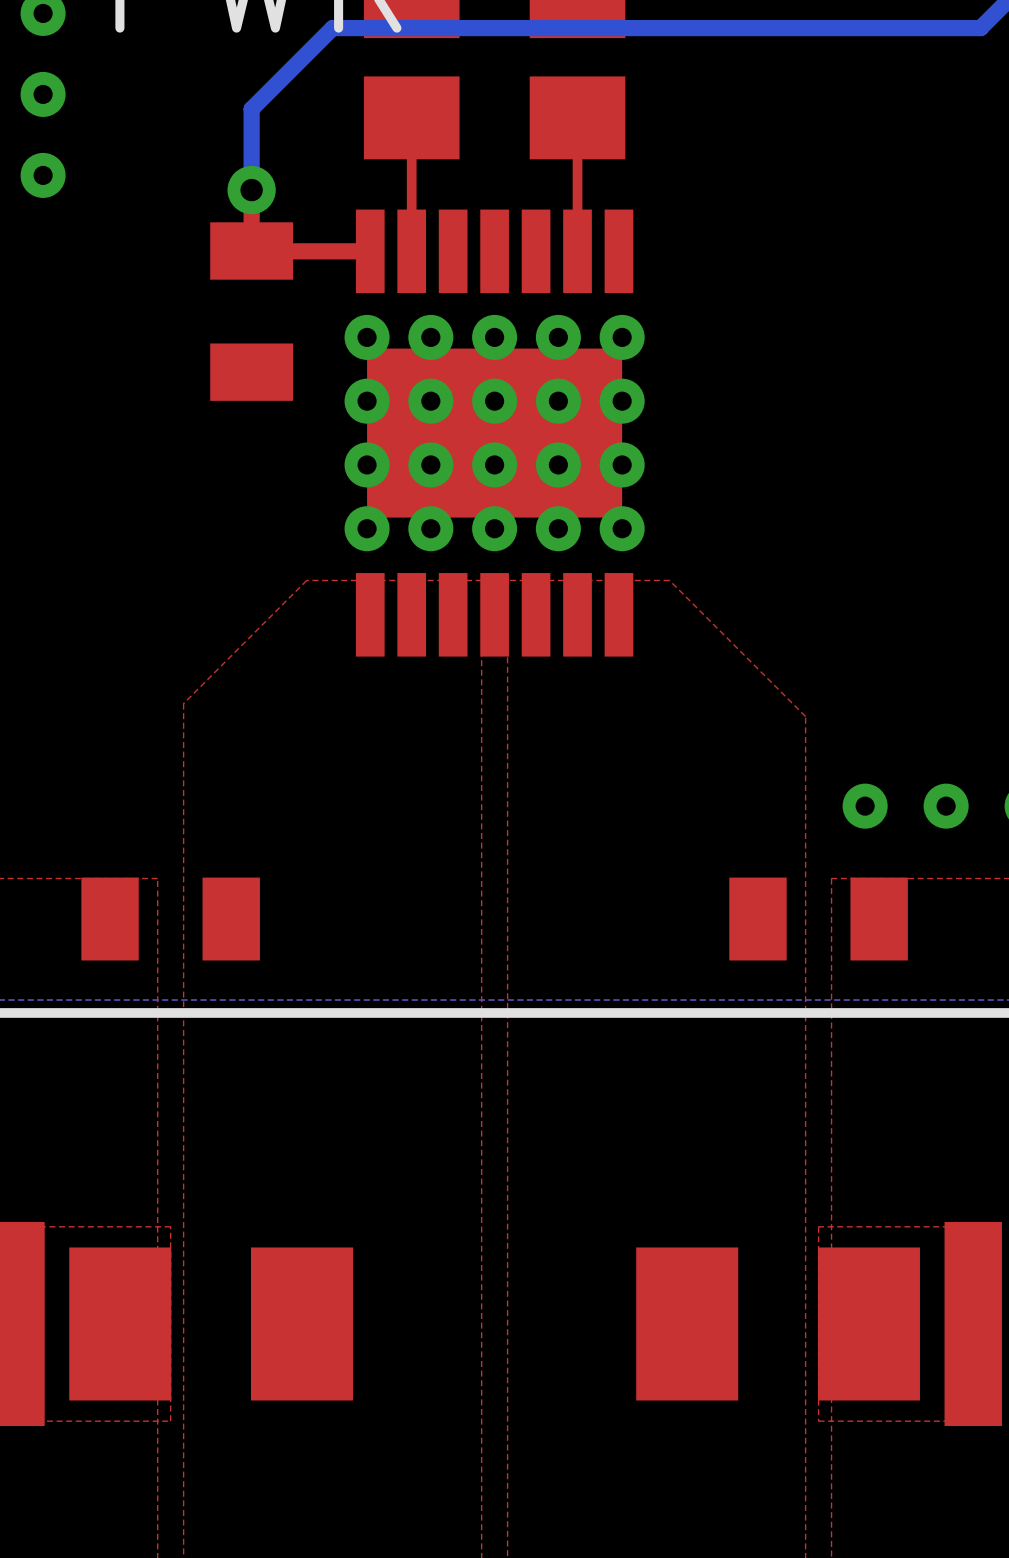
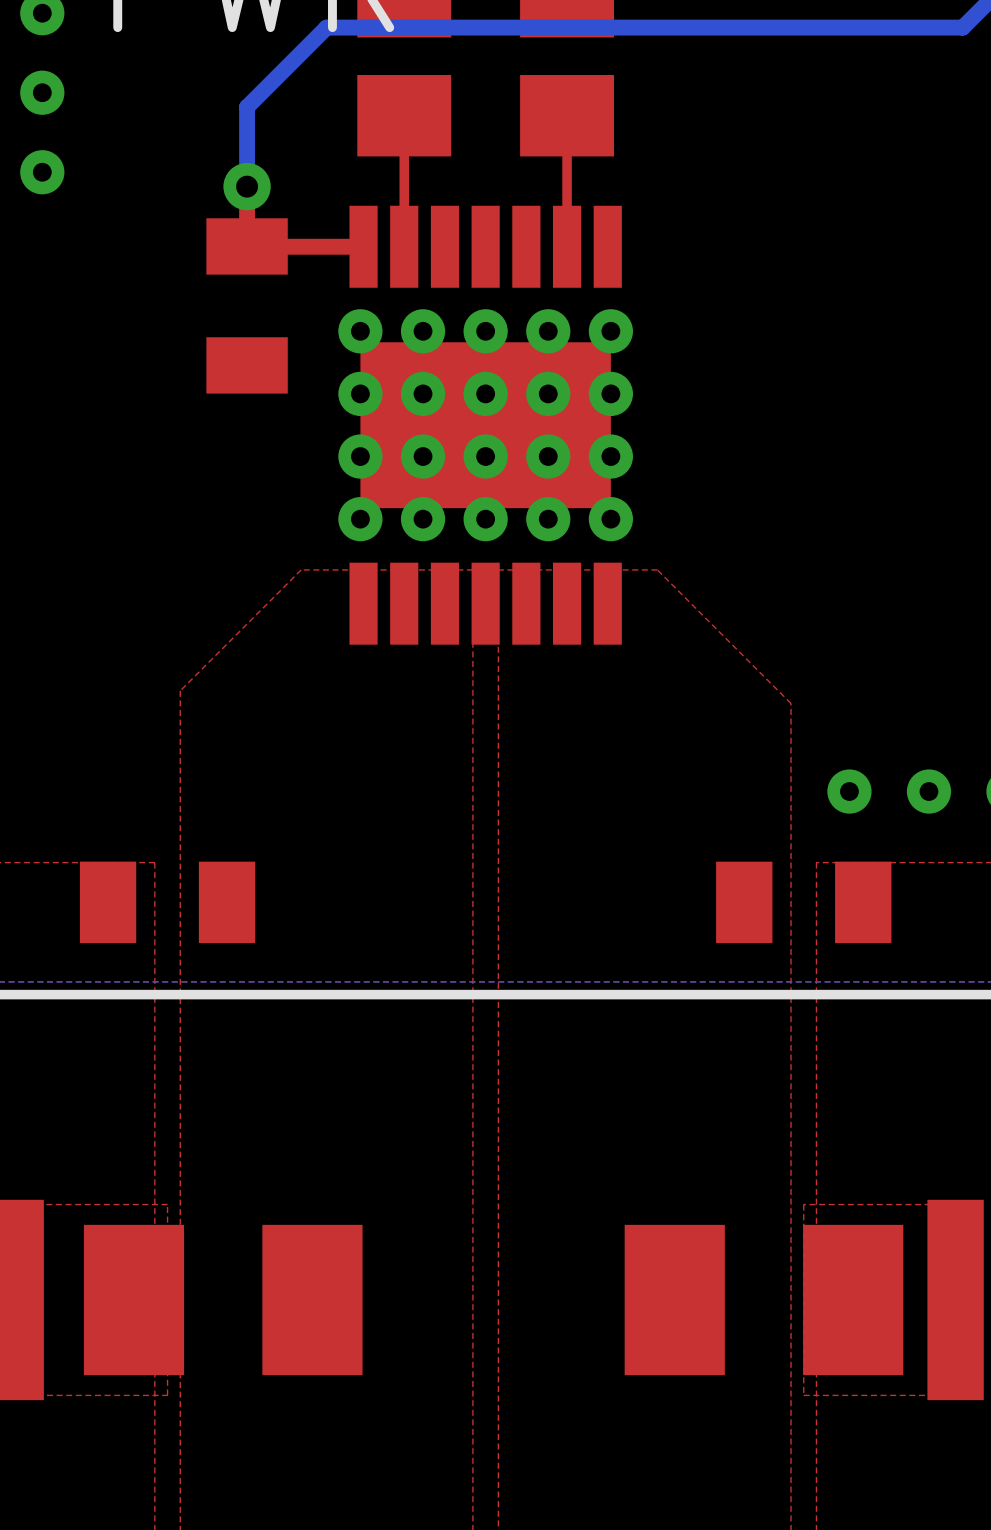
part position: (211, 1323) -> (223, 1299)

